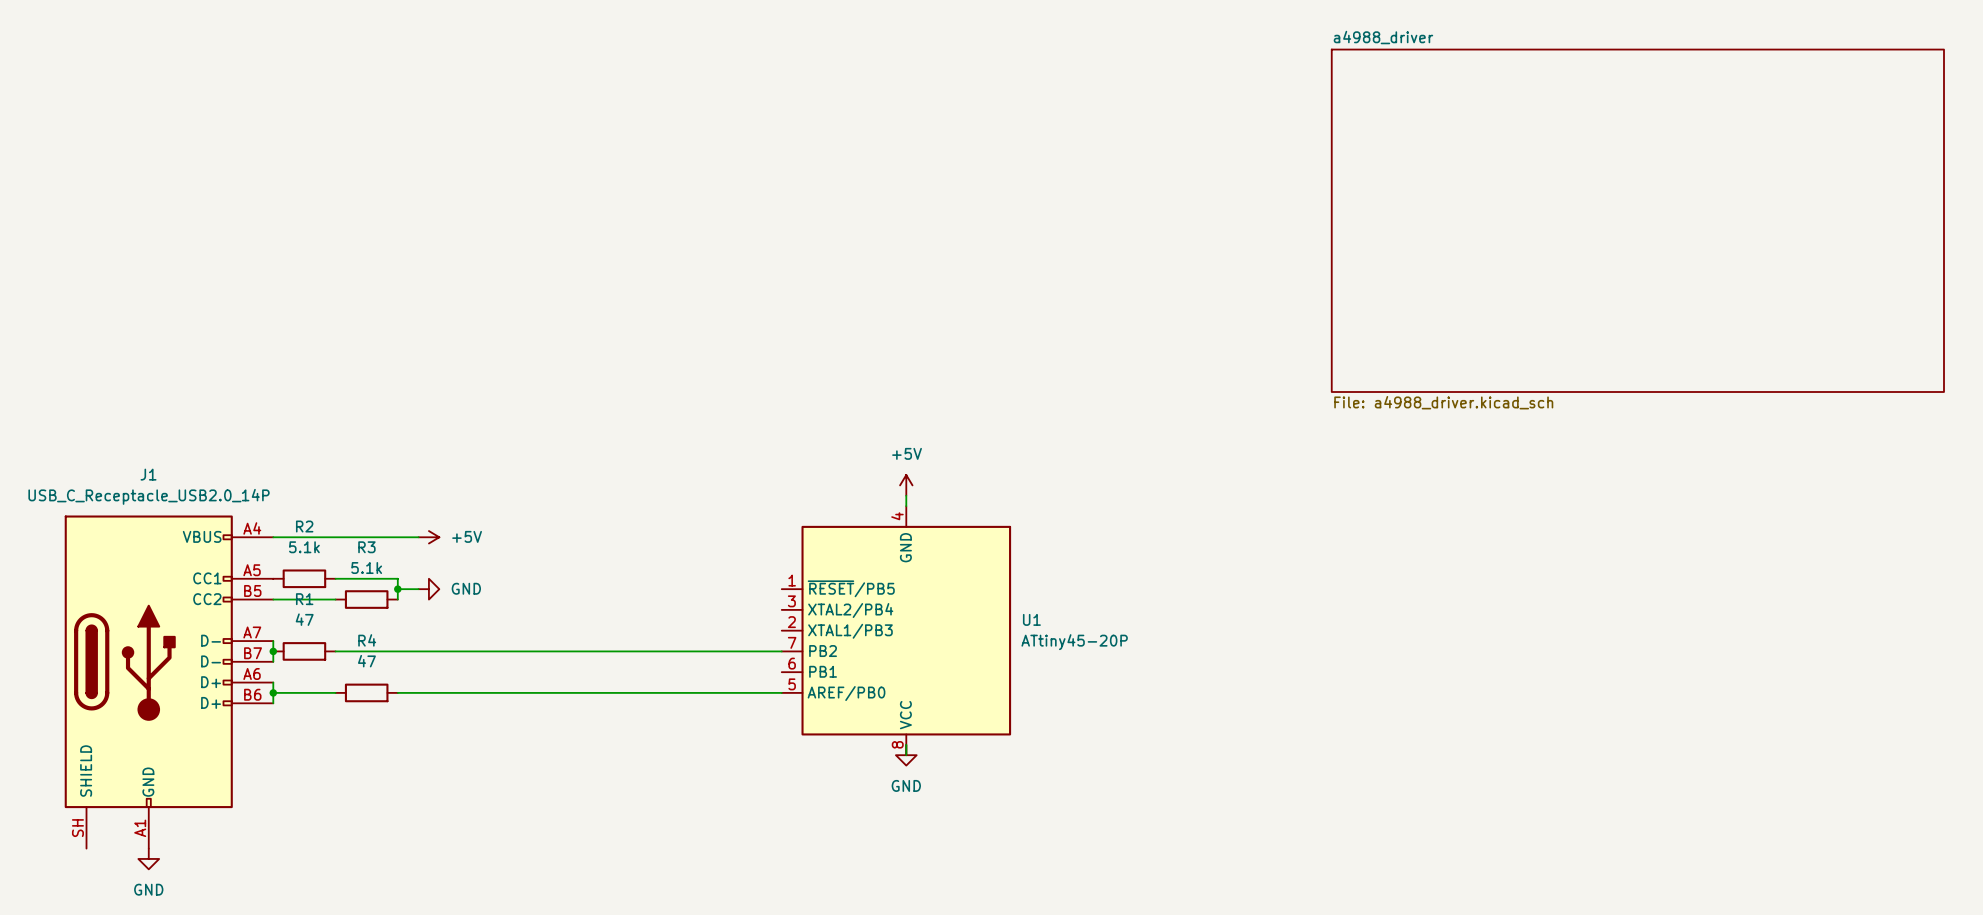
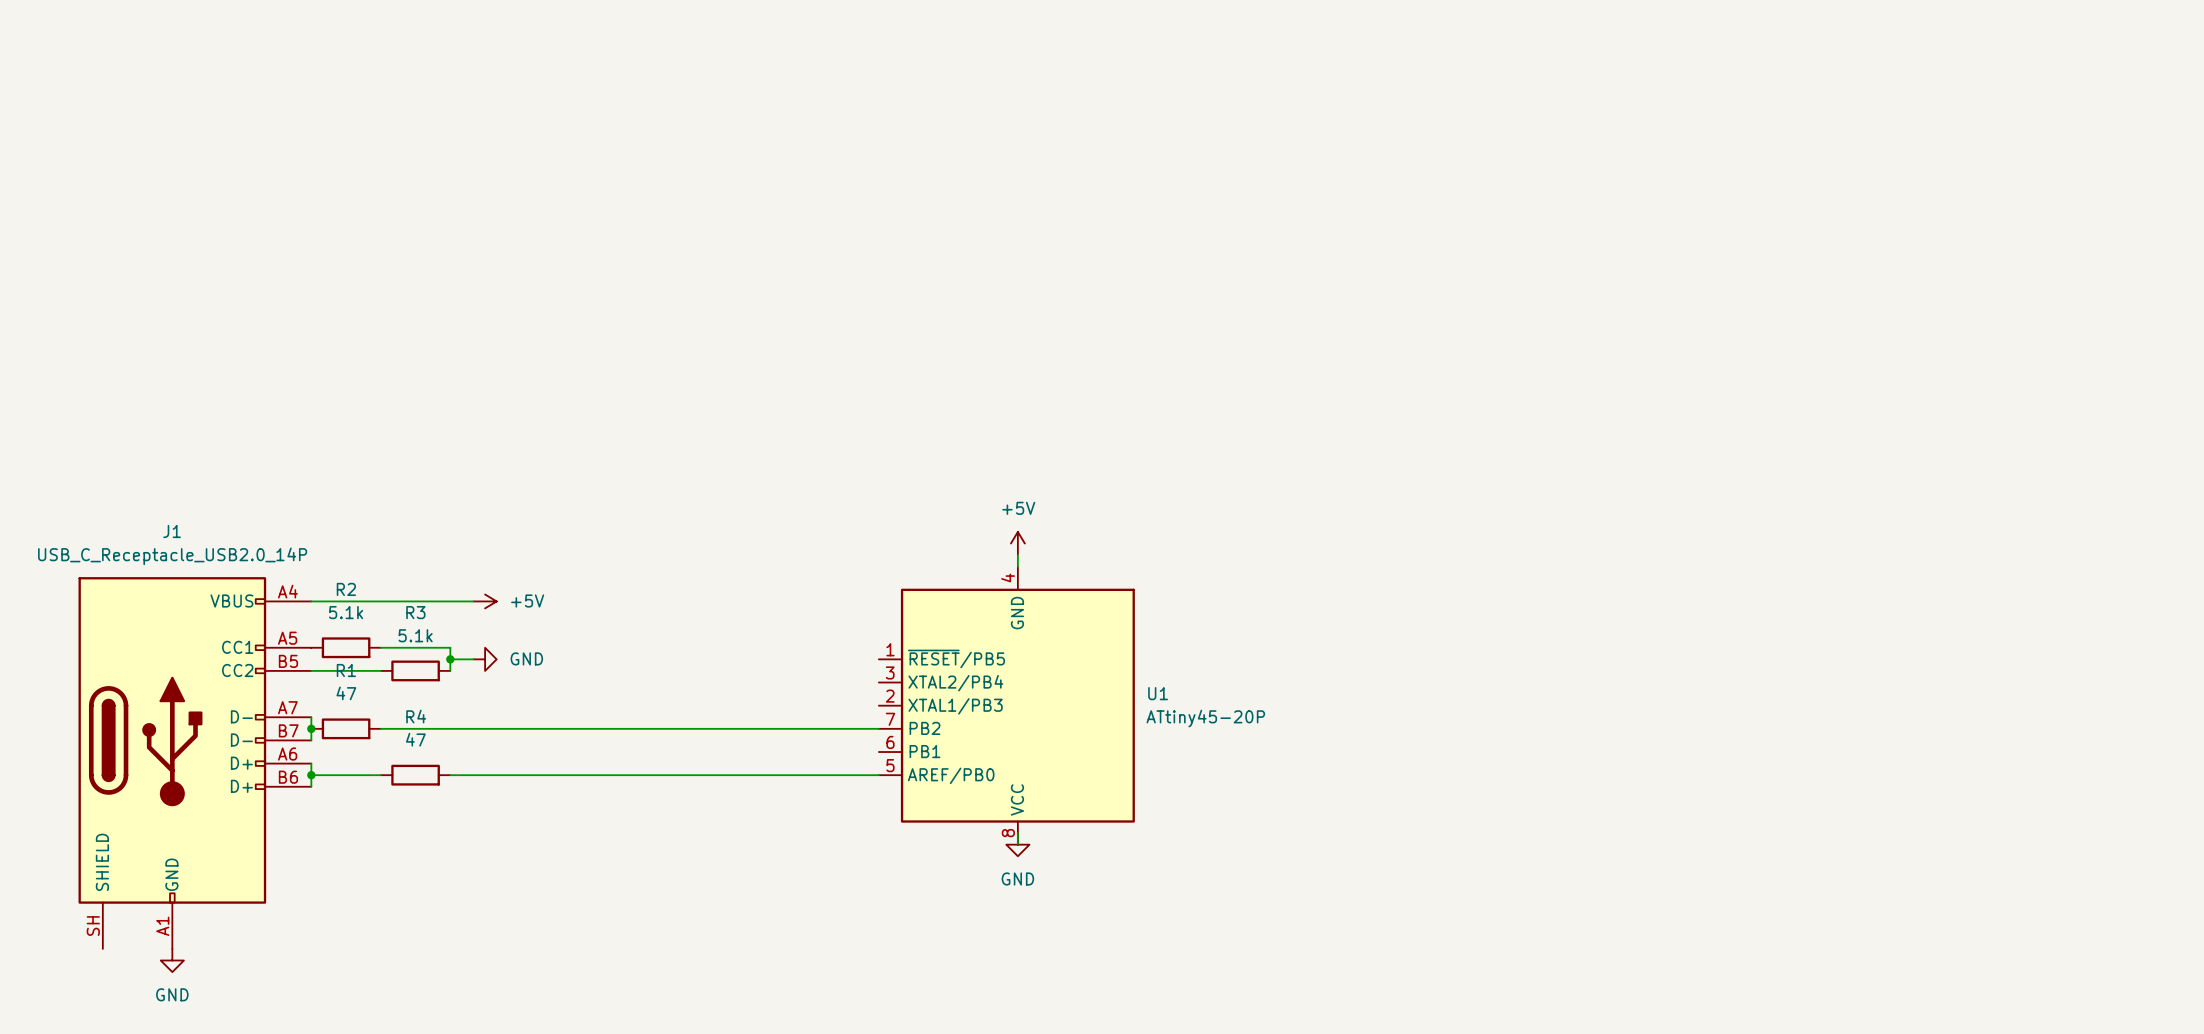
sheet a4988_driver: File: a4988_driver.kicad_sch (1637, 220) -> none

